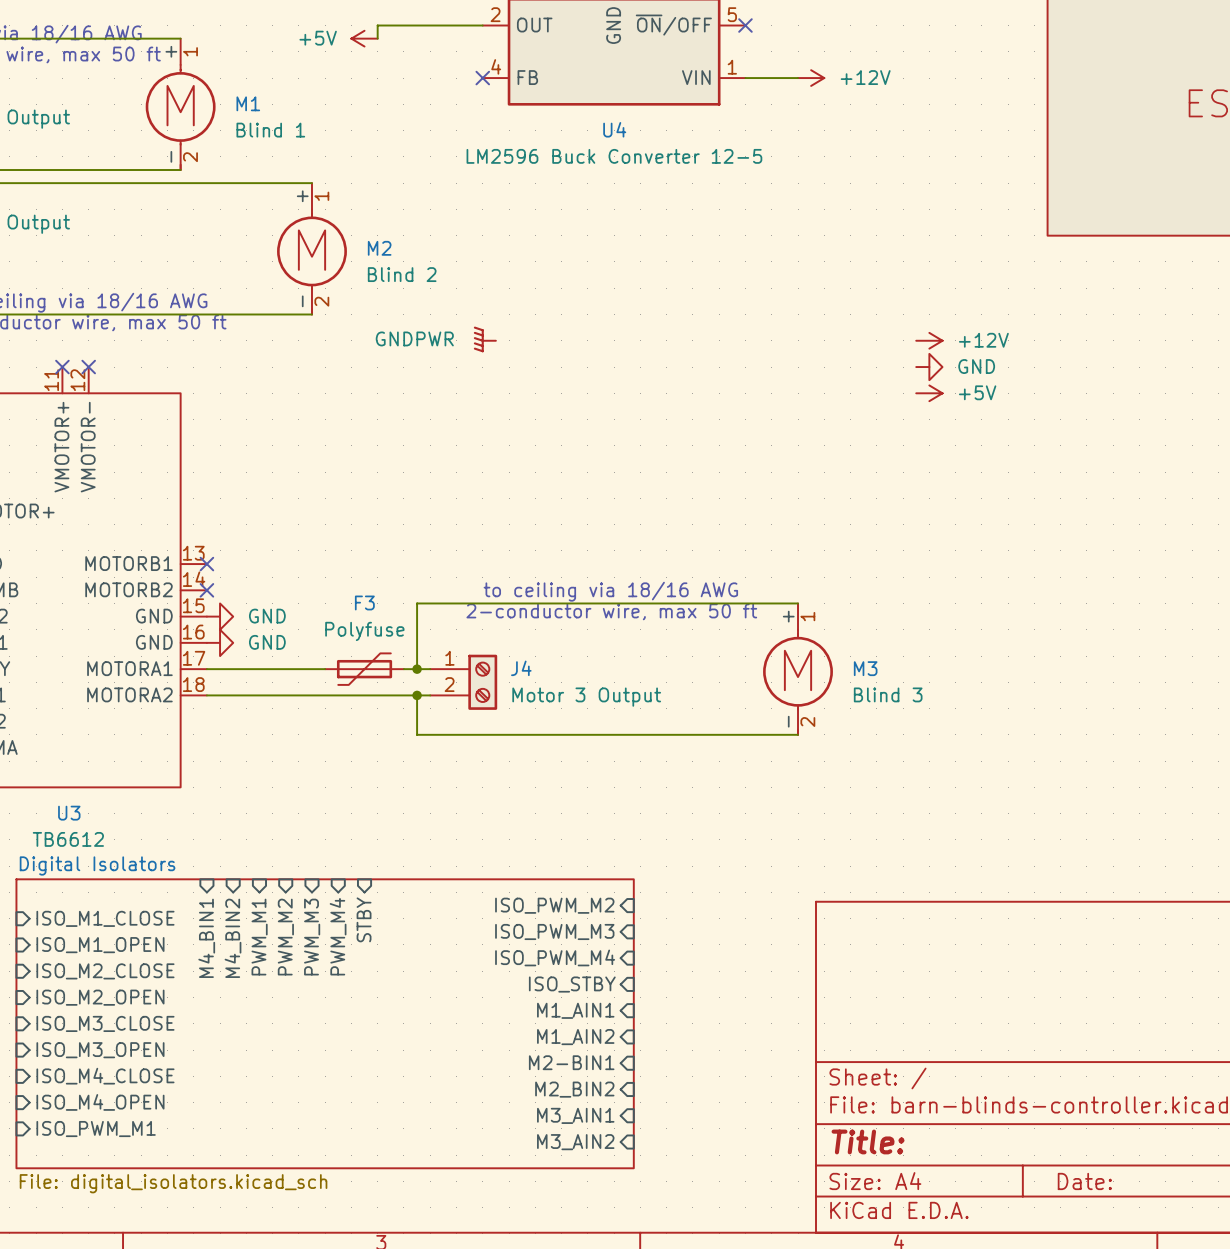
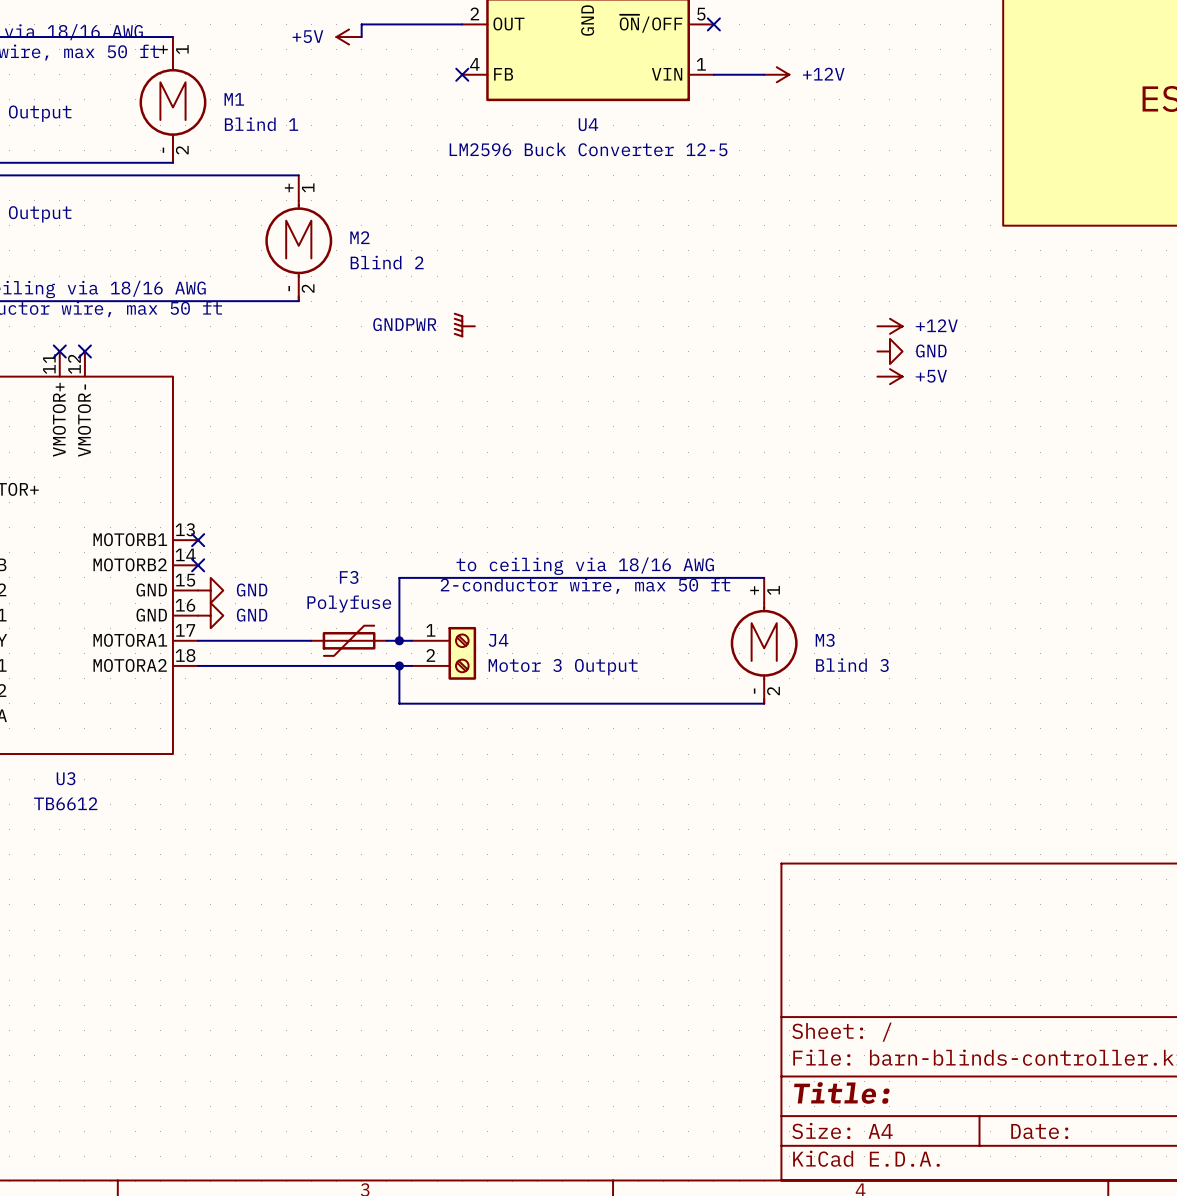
sheet pin: ISO_PWM_M2 (554, 905) -> none
sheet pin: ISO_M1_CLOSE (105, 918) -> none
sheet pin: STBY (364, 919) -> none
sheet pin: ISO_PWM_M3 (554, 931) -> none
sheet pin: PWM_M4 (338, 936) -> none
sheet pin: PWM_M1 (259, 937) -> none
sheet pin: PWM_M2 (285, 937) -> none
sheet pin: PWM_M3 (312, 937) -> none
sheet pin: M4_BIN1 (206, 938) -> none
sheet pin: M4_BIN2 (233, 938) -> none
sheet pin: ISO_M1_OPEN (100, 945) -> none
sheet pin: ISO_PWM_M4 (555, 957) -> none
sheet pin: ISO_M2_CLOSE (105, 971) -> none
sheet pin: ISO_STBY (572, 984) -> none
sheet pin: ISO_M2_OPEN (100, 997) -> none
sheet pin: M1_AIN1 (575, 1010) -> none
sheet pin: ISO_M3_CLOSE (105, 1023) -> none
sheet Digital Isolators: File: digital_isolators.kicad_sch (325, 1023) -> none
sheet pin: M1_AIN2 (575, 1037) -> none
sheet pin: ISO_M3_OPEN (100, 1050) -> none
sheet pin: M2-BIN1 (571, 1062) -> none
sheet pin: ISO_M4_CLOSE (105, 1076) -> none
sheet pin: M2_BIN2 (574, 1089) -> none
sheet pin: ISO_M4_OPEN (100, 1102) -> none
sheet pin: M3_AIN1 (575, 1115) -> none
sheet pin: ISO_PWM_M1 (96, 1129) -> none
sheet pin: M3_AIN2 (575, 1142) -> none

